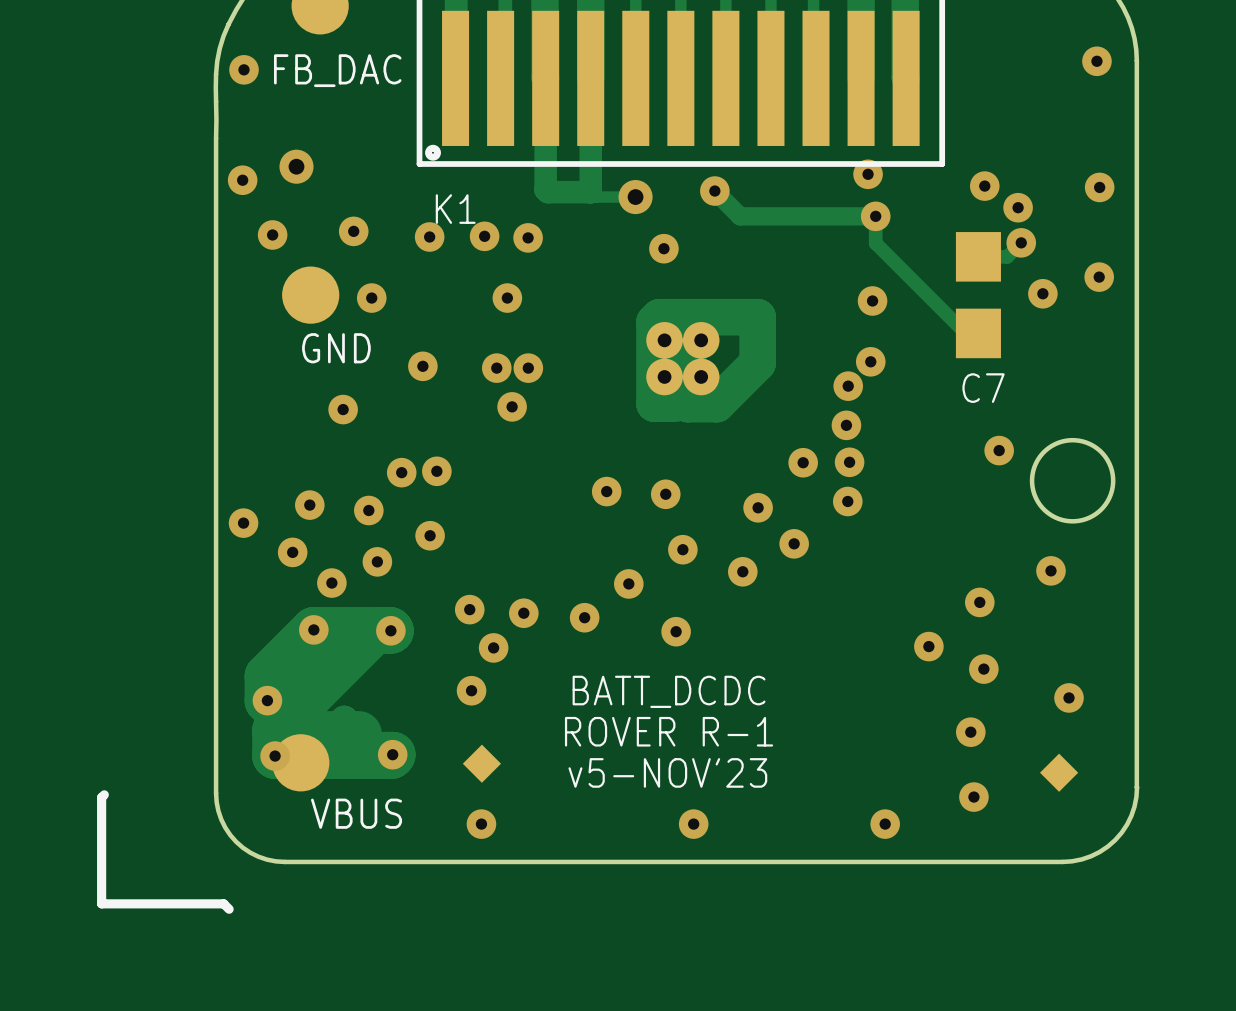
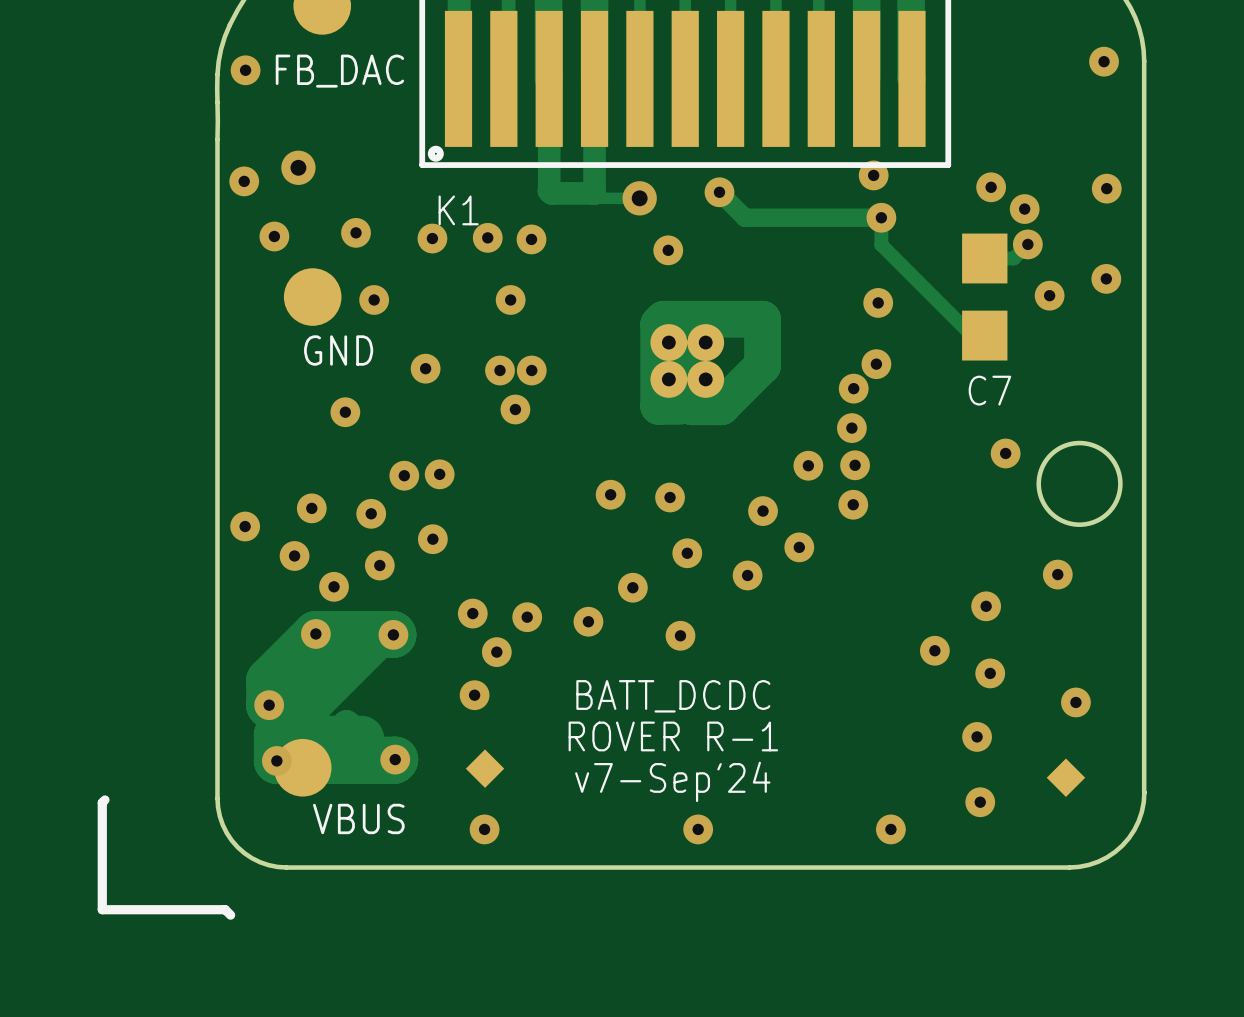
text: v5-NOV'23 (667, 772) -> v7-Sep'24 (672, 781)

